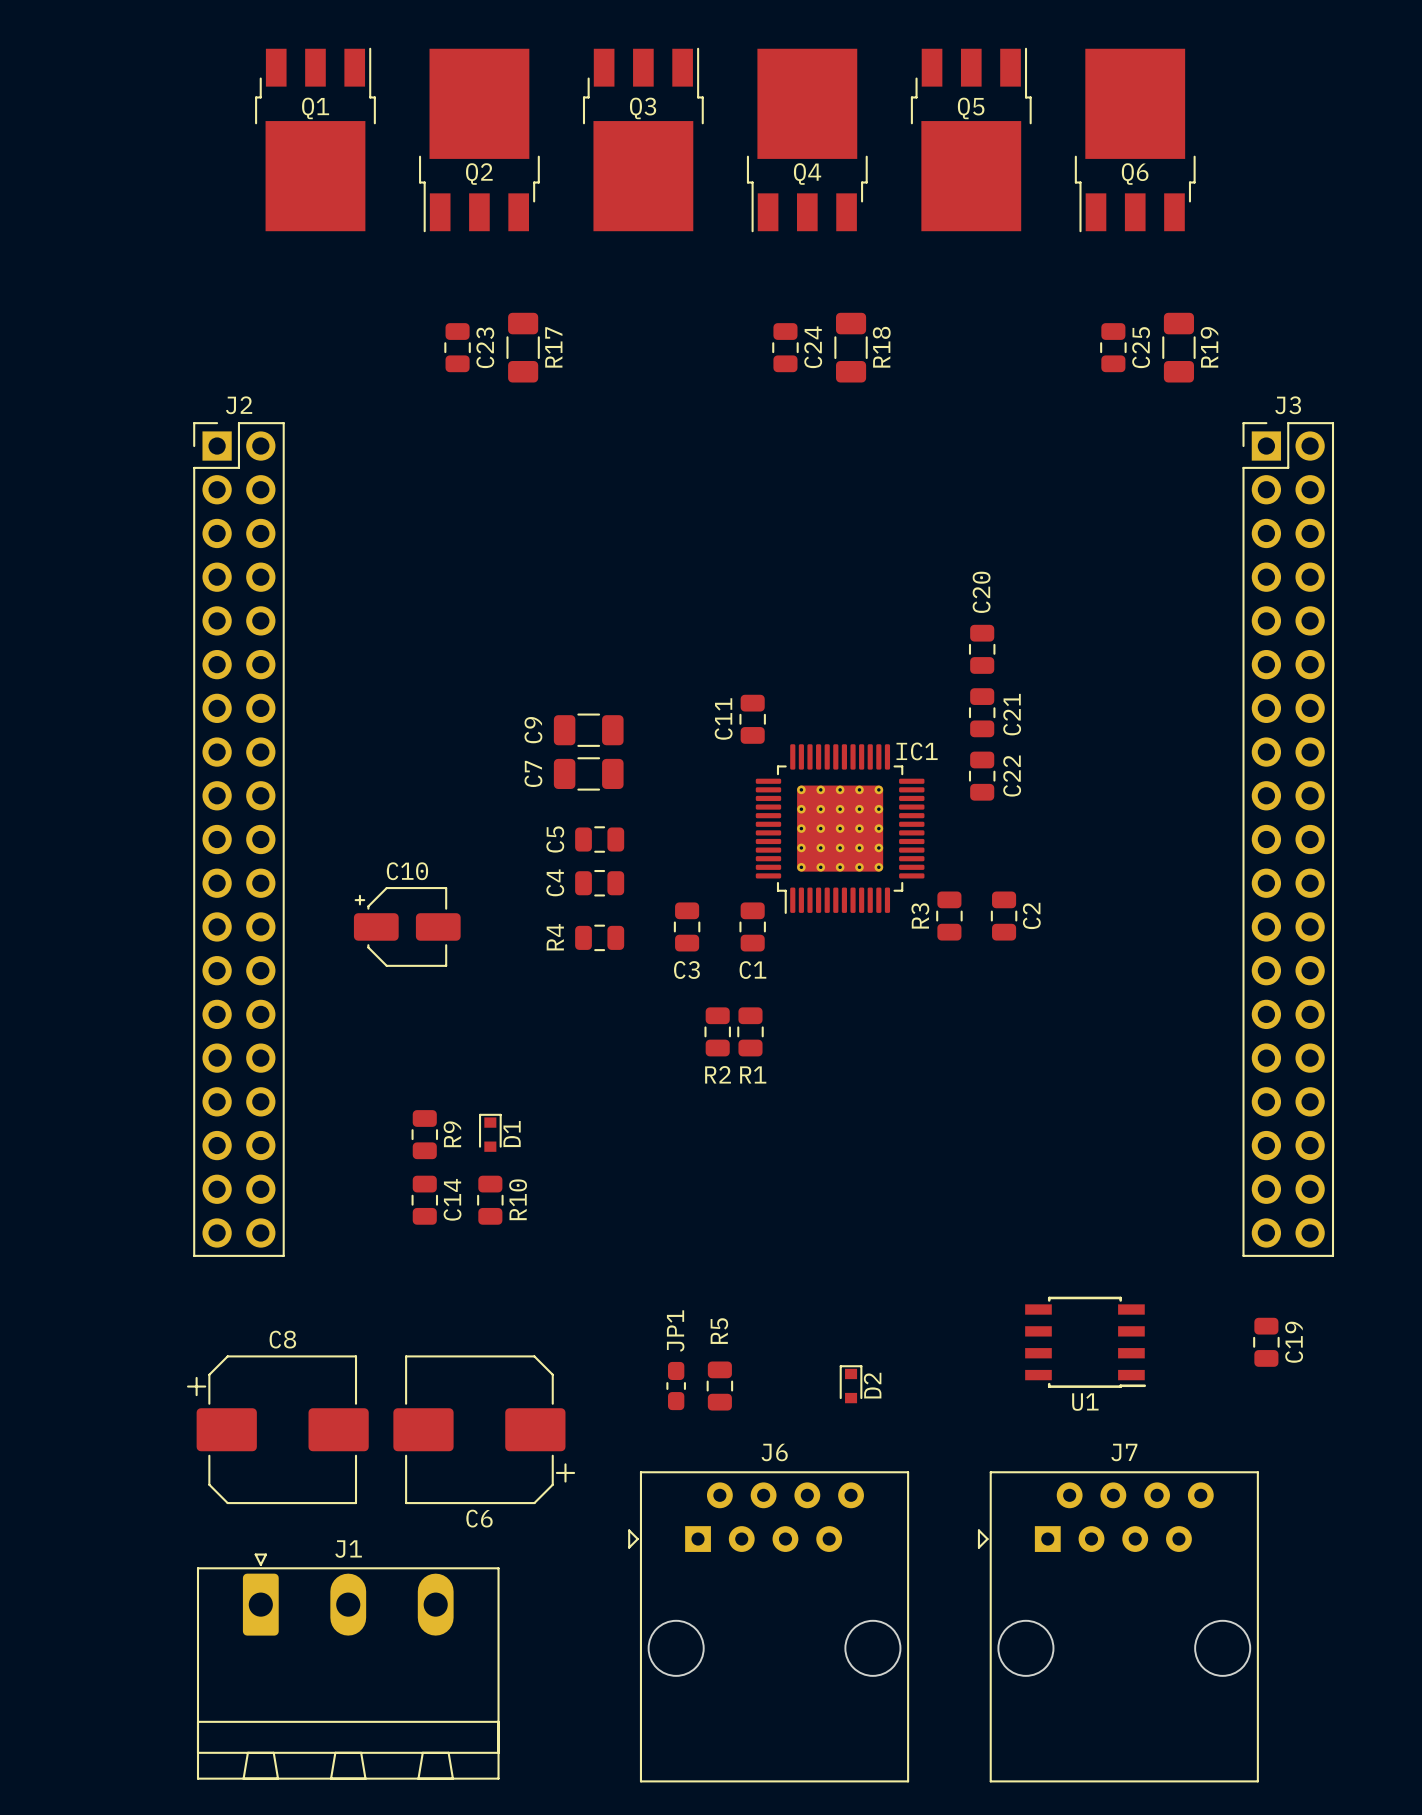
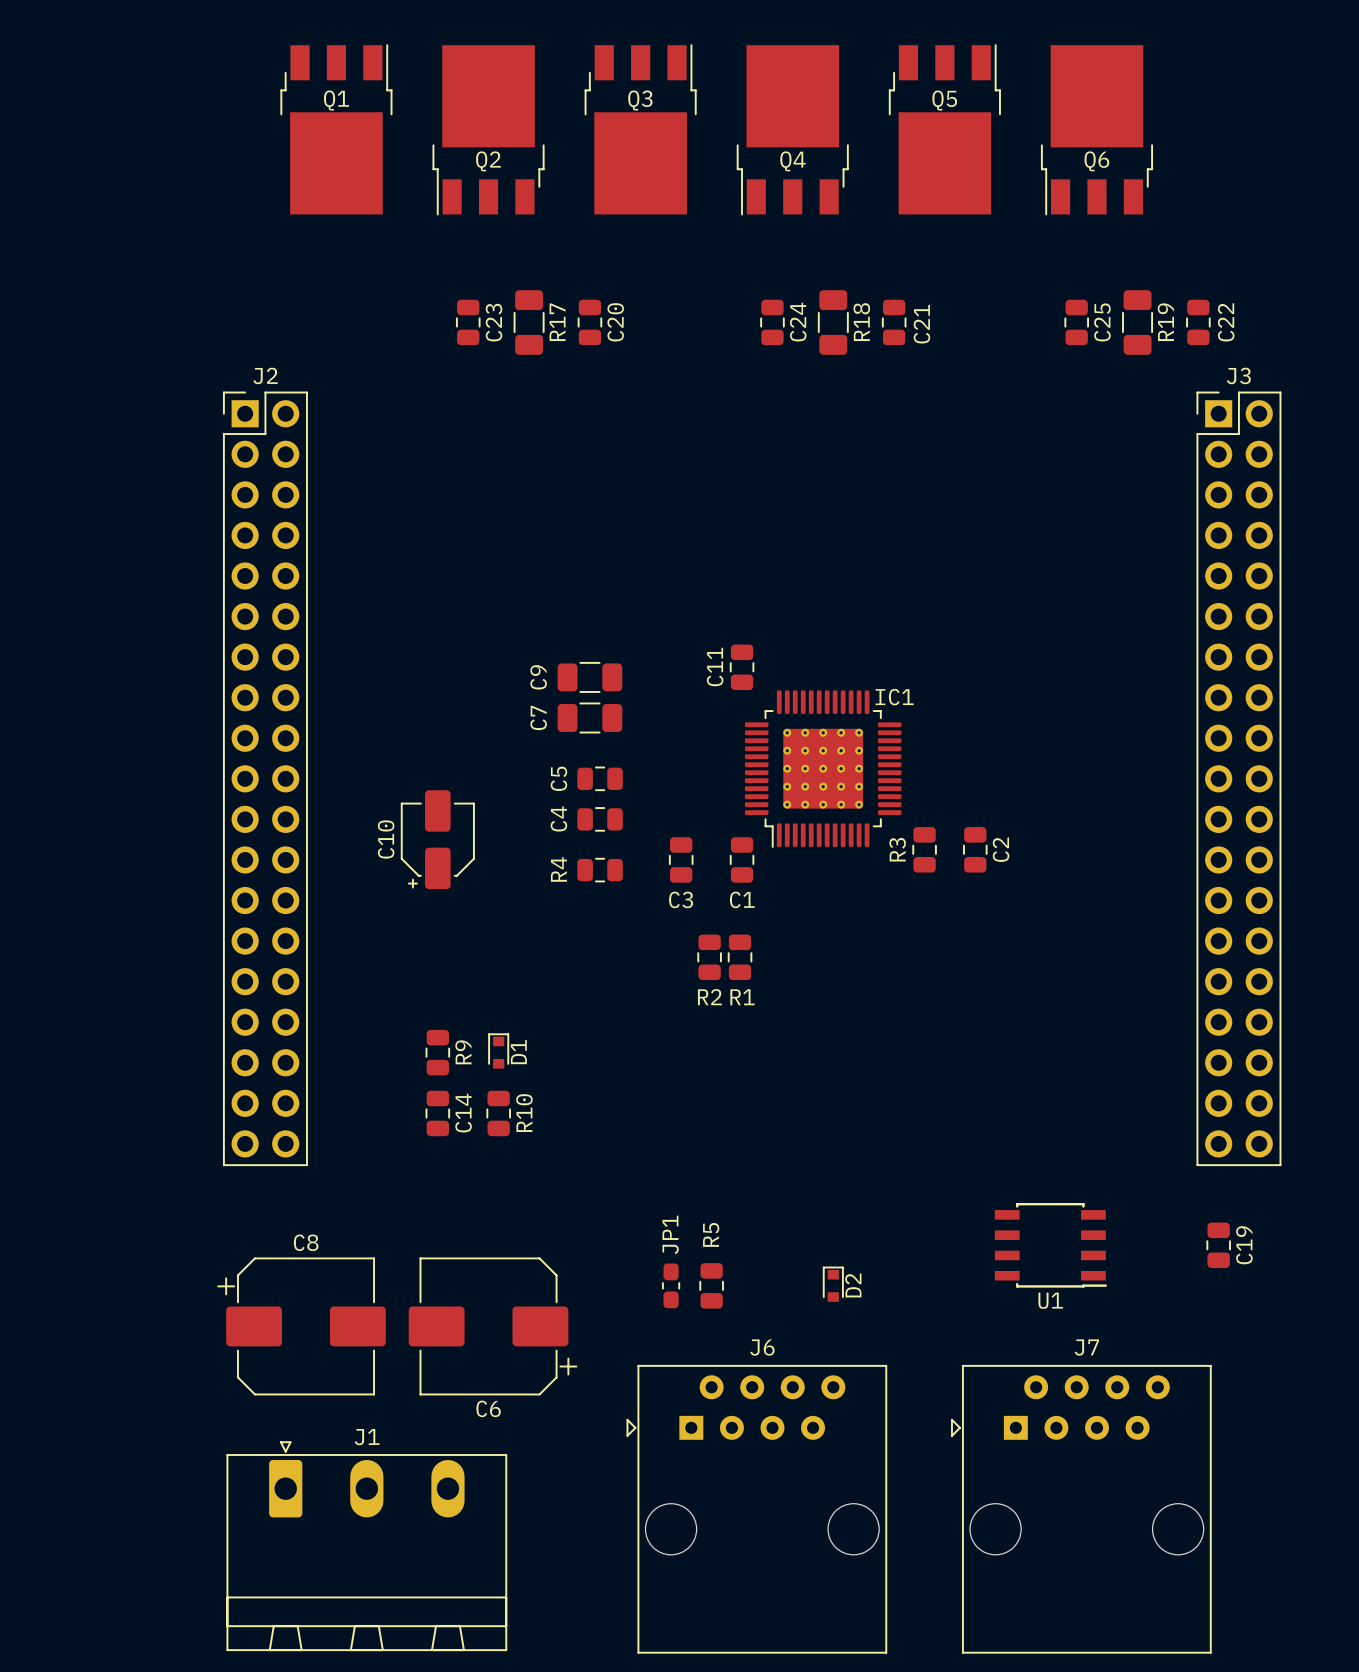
C20 name position: C20 (981, 592) -> C20 (615, 322)
C20 position: (982, 649) -> (589, 322)
C21 position: (982, 712) -> (894, 322)
C22 position: (982, 776) -> (1198, 322)
C10 rotation: 0° (407, 926) -> 90° counterclockwise (437, 839)

